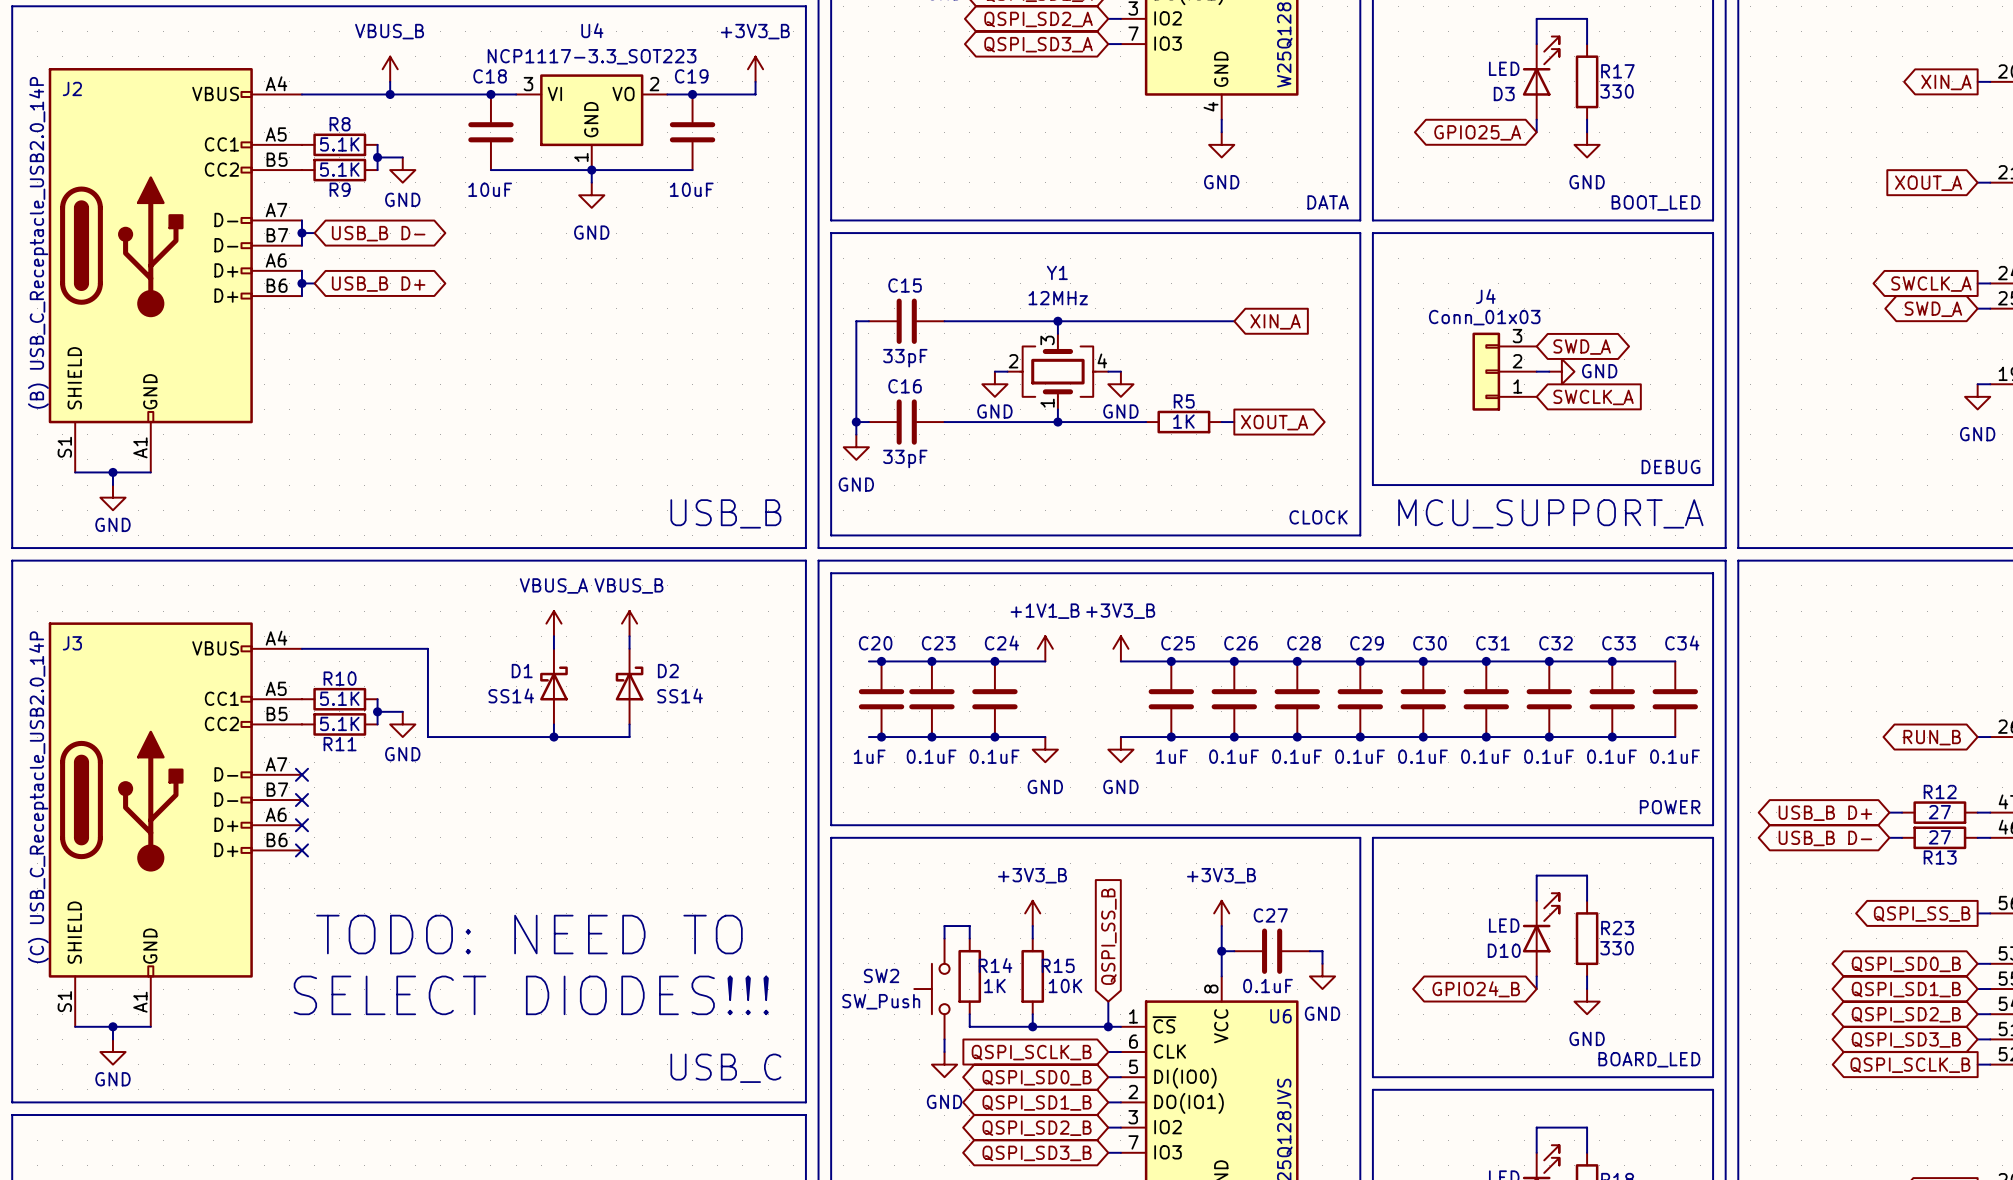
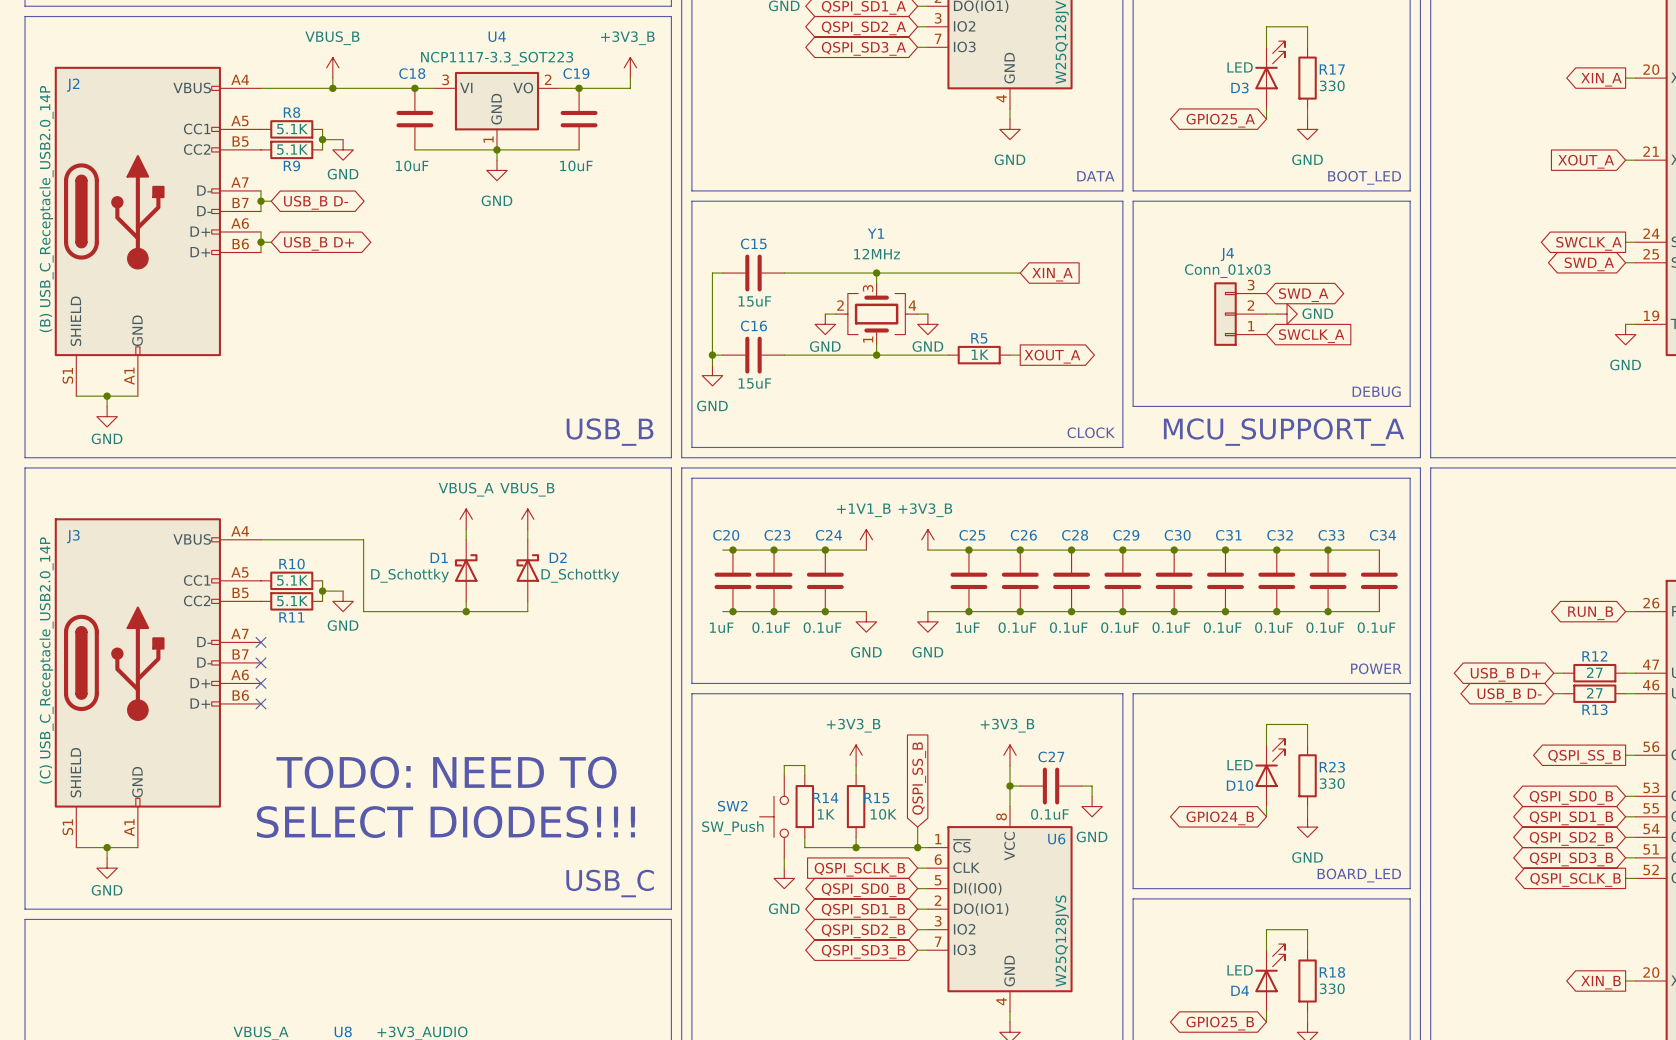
C15 value: 33pF (905, 358) -> 15uF (754, 301)
C16 value: 33pF (905, 458) -> 15uF (754, 383)
D1 value: SS14 (511, 695) -> D_Schottky (410, 575)
D2 value: SS14 (680, 695) -> D_Schottky (580, 575)

